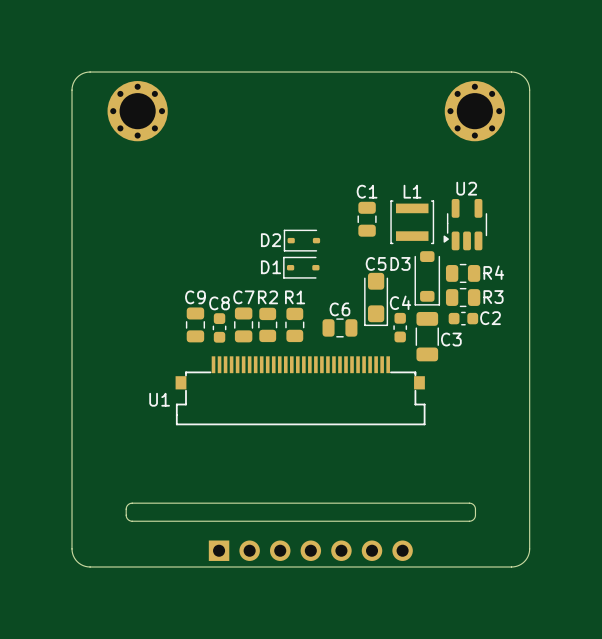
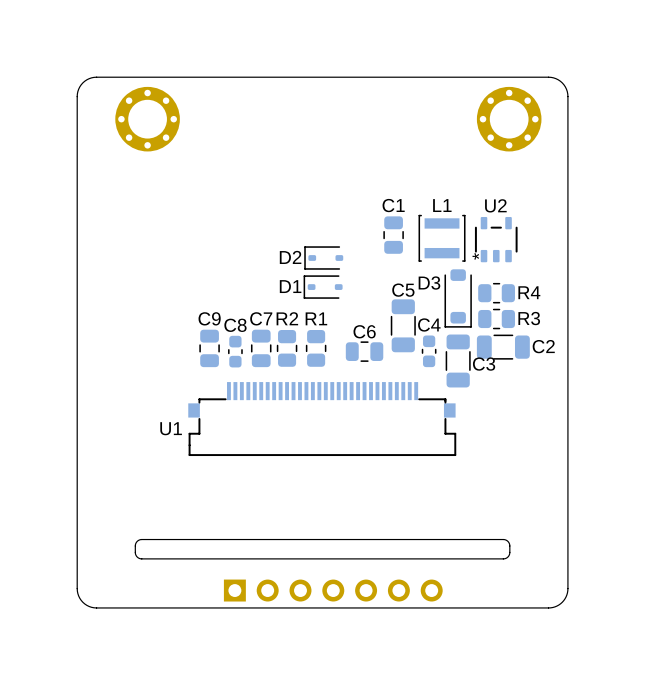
U2 footprint: [443, 199, 488, 251] -> [474, 216, 518, 263]
C5 footprint: [364, 272, 389, 327] -> [390, 299, 416, 353]
C2 footprint: [448, 311, 479, 326] -> [476, 334, 530, 360]

